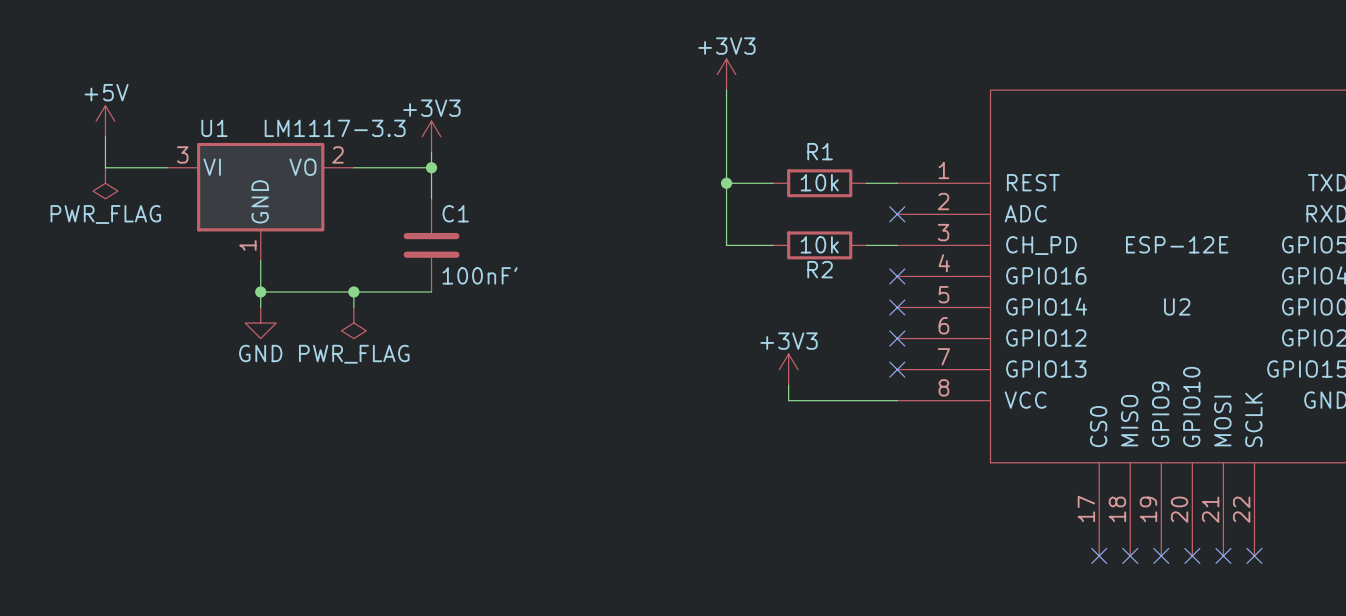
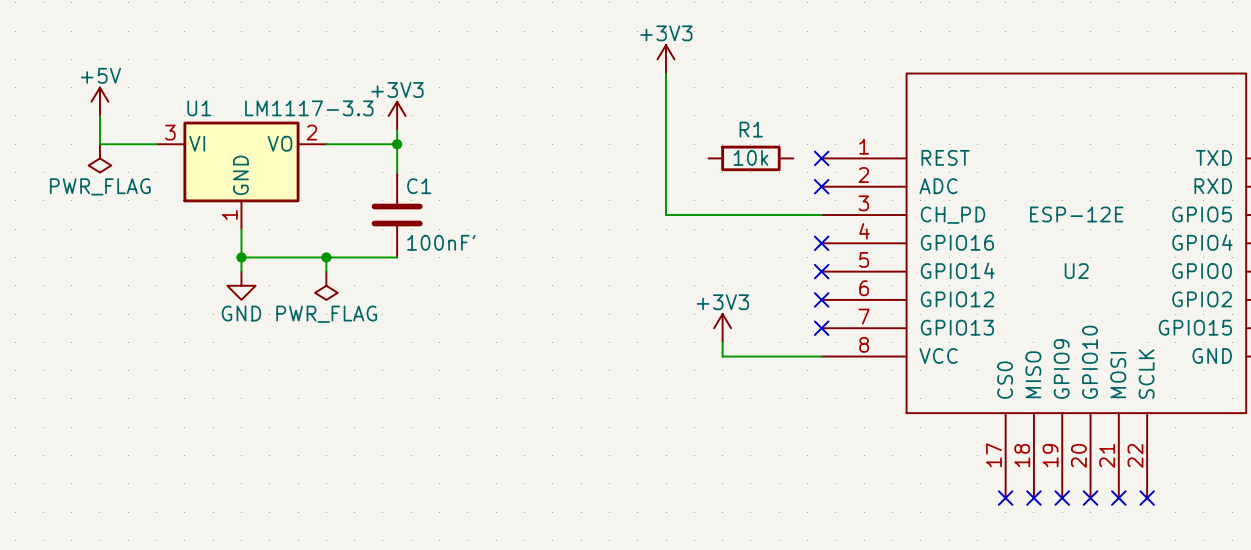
wire: (726, 183) (773, 183) -> none
junction: (726, 183) -> none
wire: (866, 183) (897, 183) -> none
no-connect mark: none -> (821, 158)
wire: none -> (708, 215) (793, 215)
R2: 10k (819, 245) -> none

